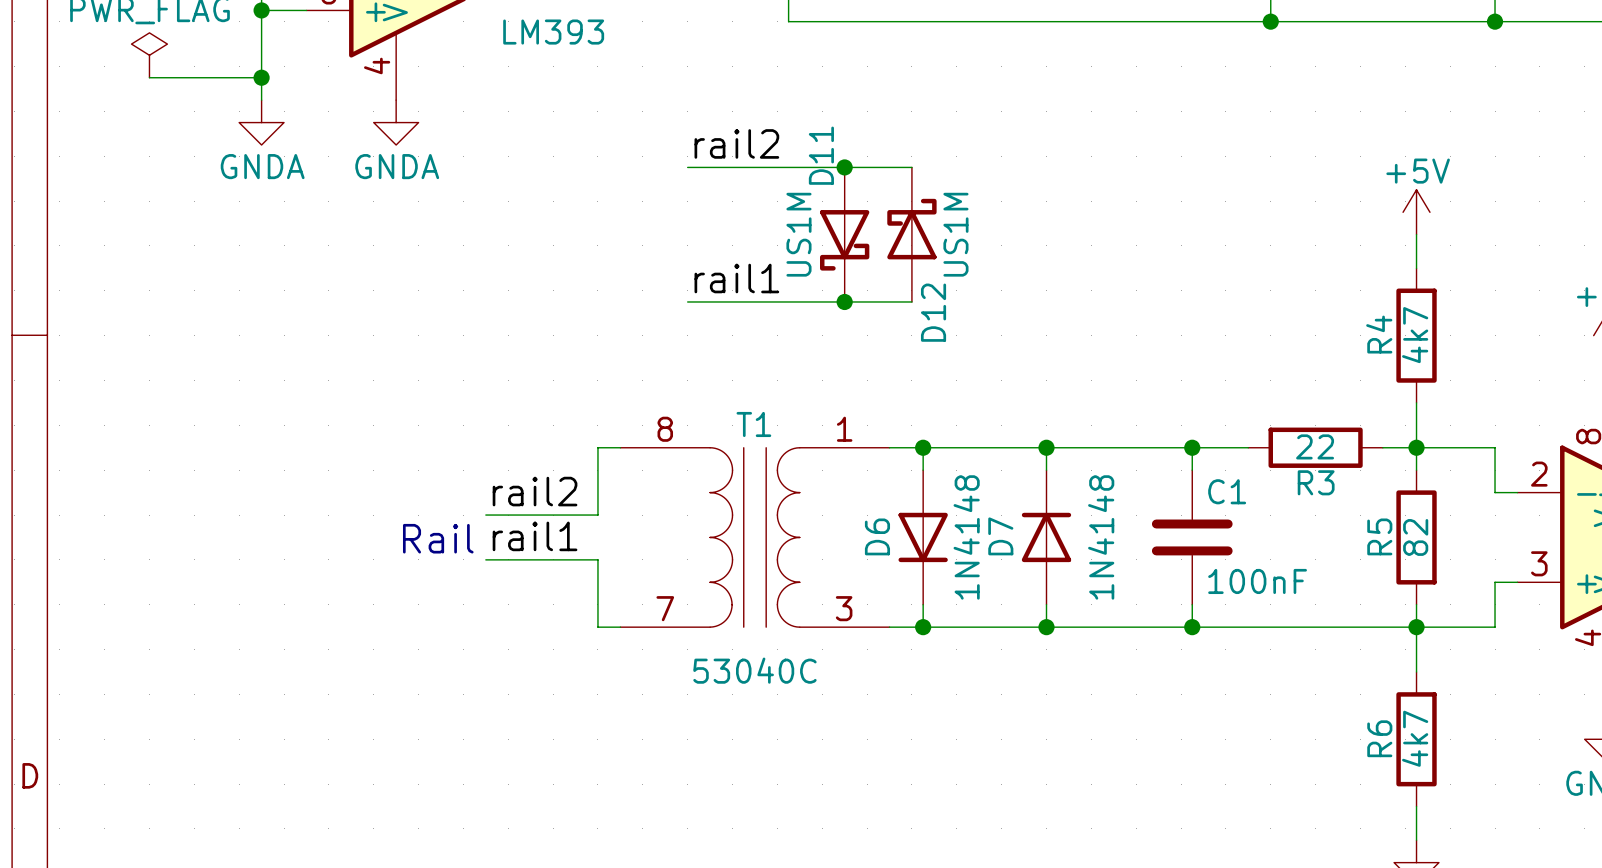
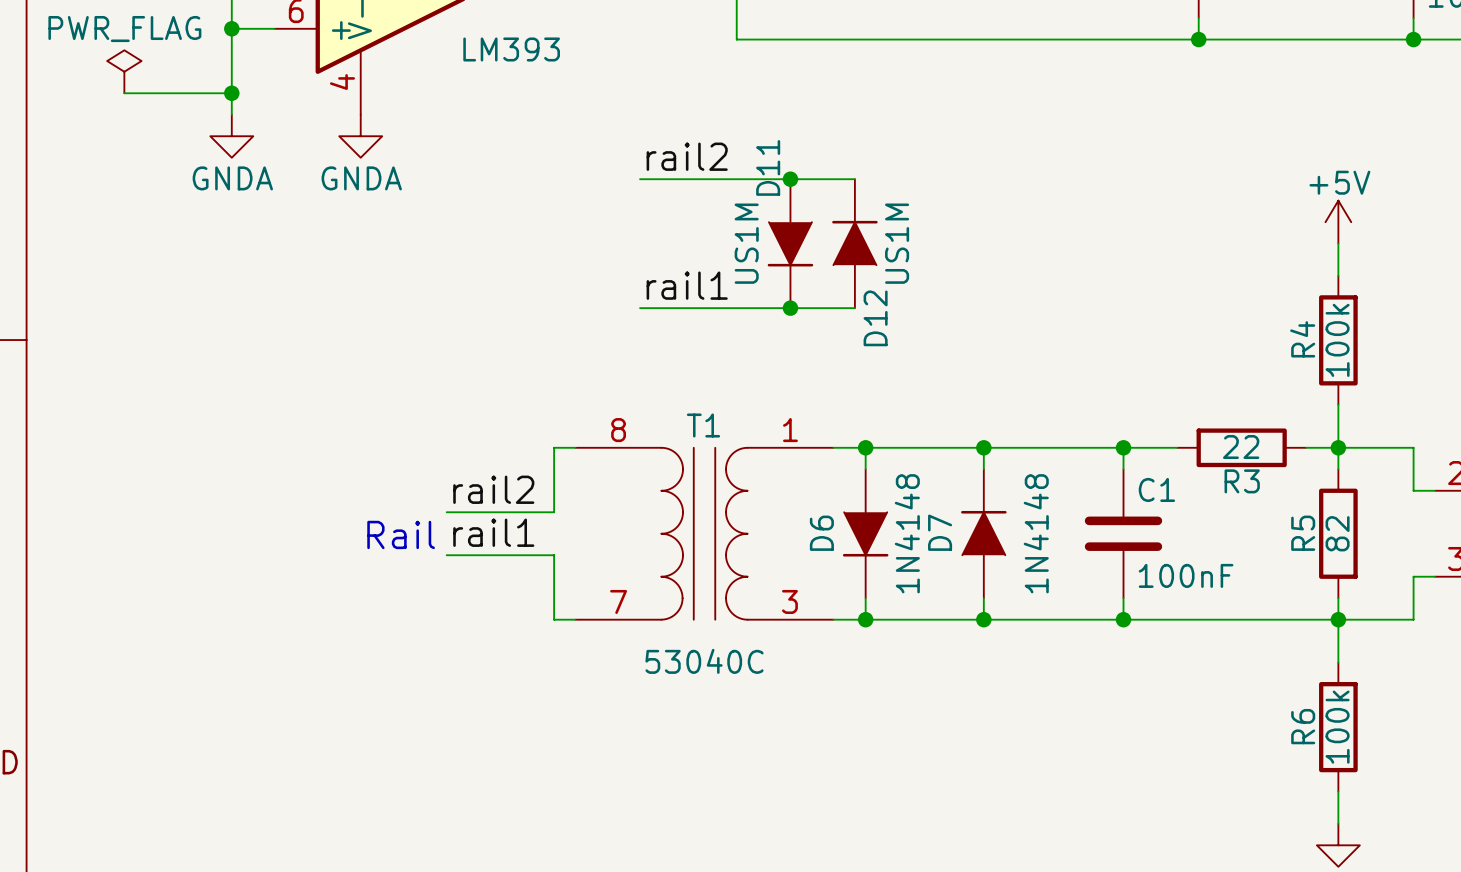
D11 symbol: [819, 167, 870, 302] -> [767, 179, 814, 309]
D12 symbol: [887, 167, 937, 302] -> [832, 179, 878, 309]
R4 value: 4k7 (1415, 335) -> 100k (1337, 340)
D6 symbol: [898, 470, 948, 605] -> [842, 469, 889, 599]
D7 symbol: [1021, 470, 1072, 605] -> [961, 469, 1007, 599]
R6 value: 4k7 (1415, 738) -> 100k (1337, 727)

